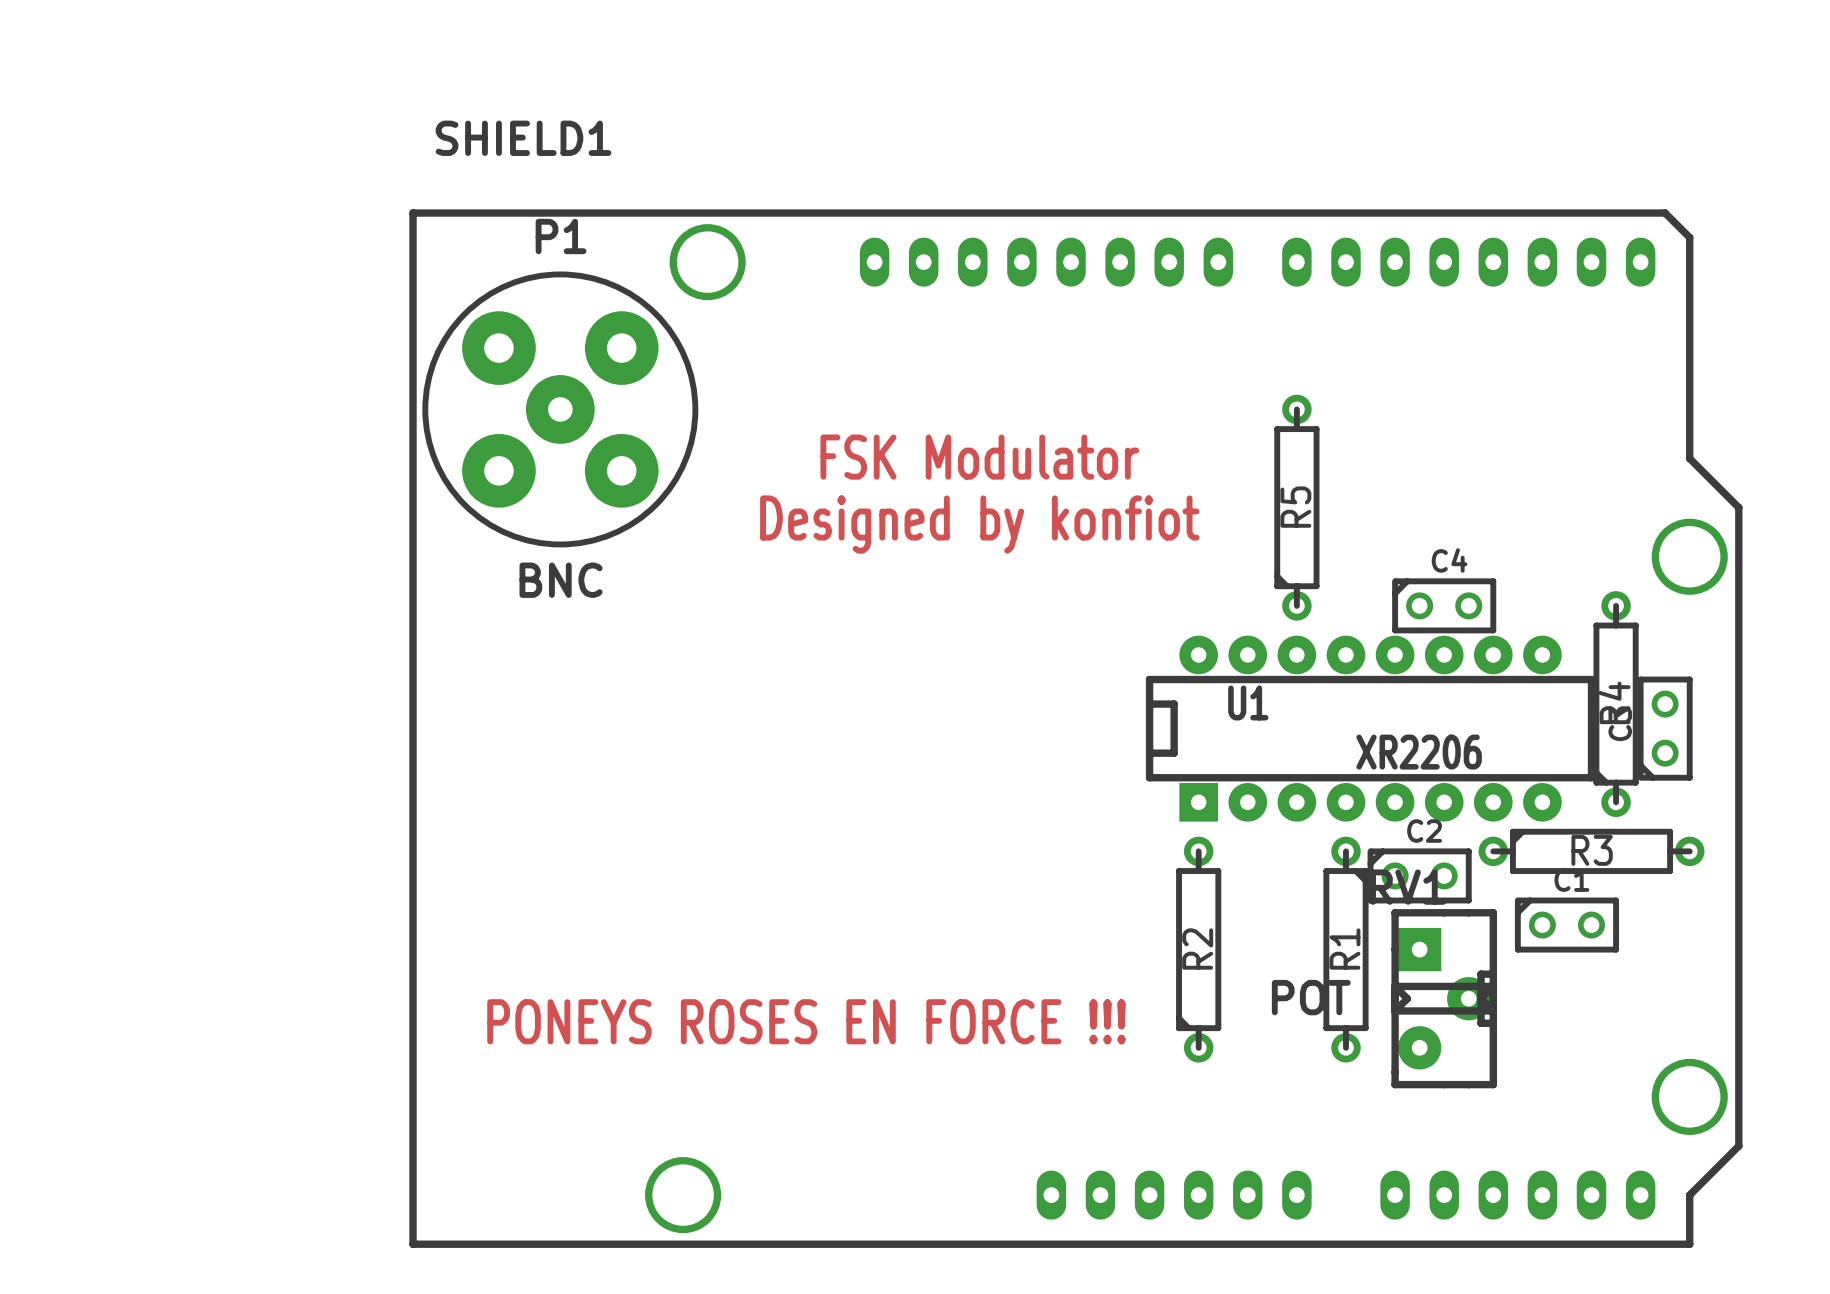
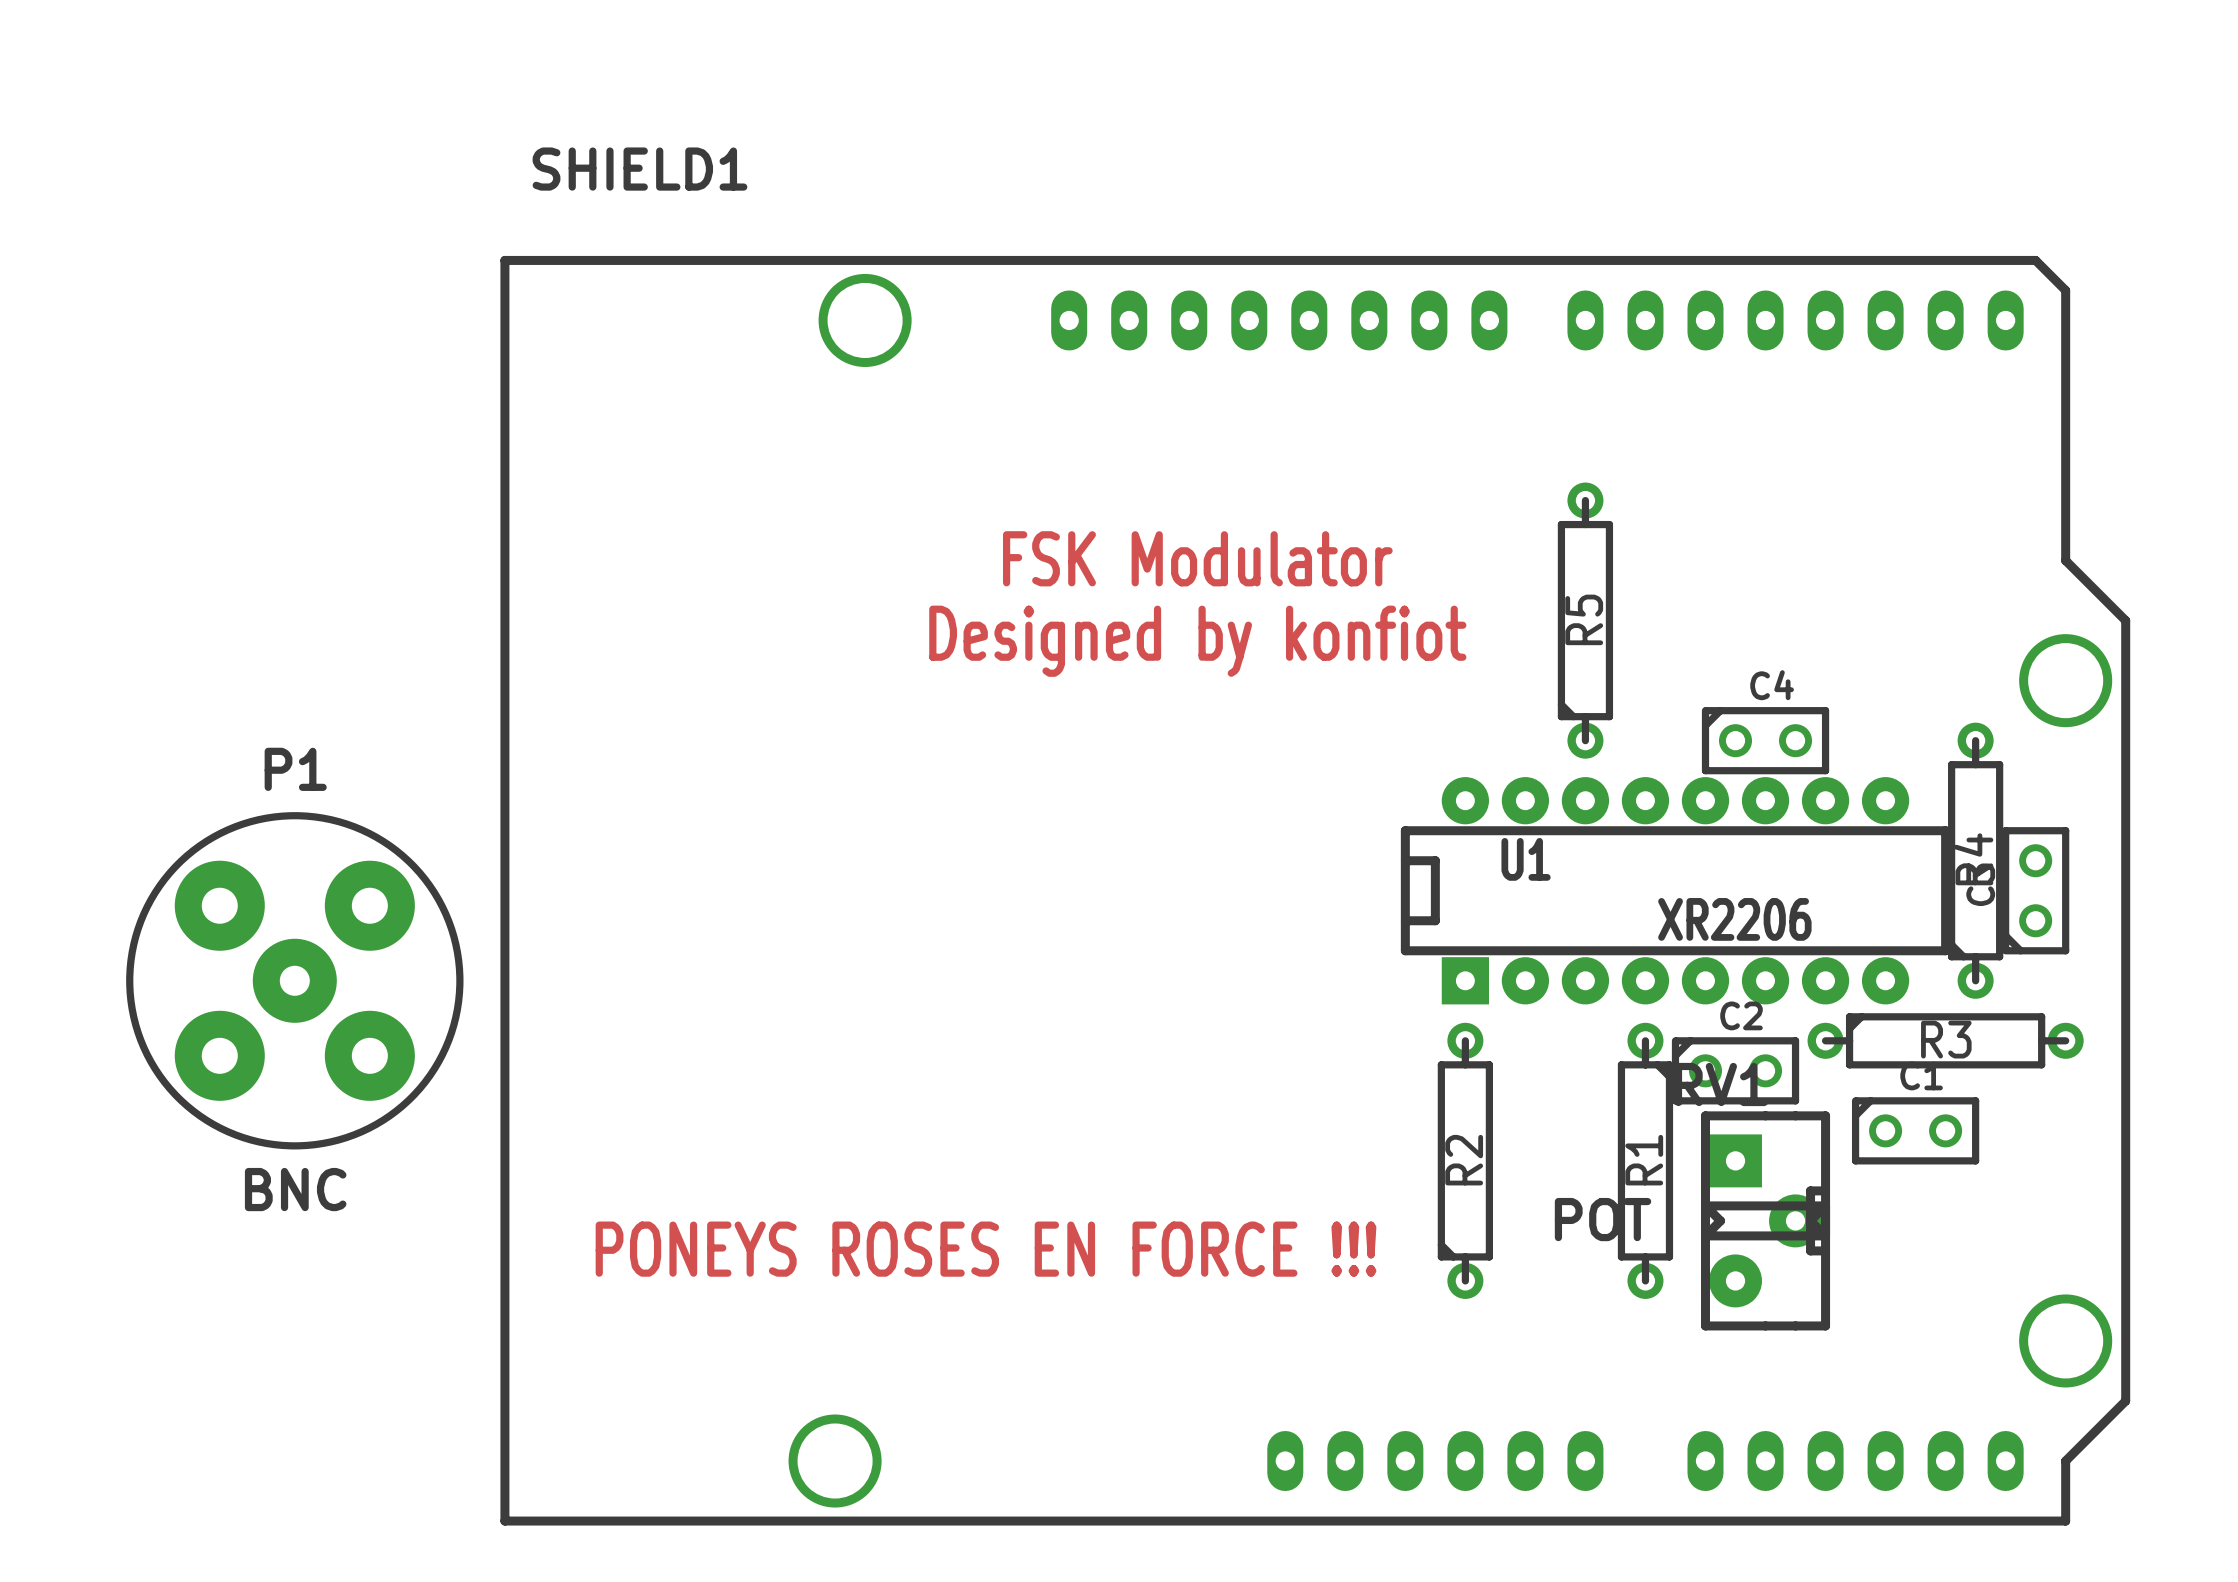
P1 position: (560, 409) -> (294, 980)

